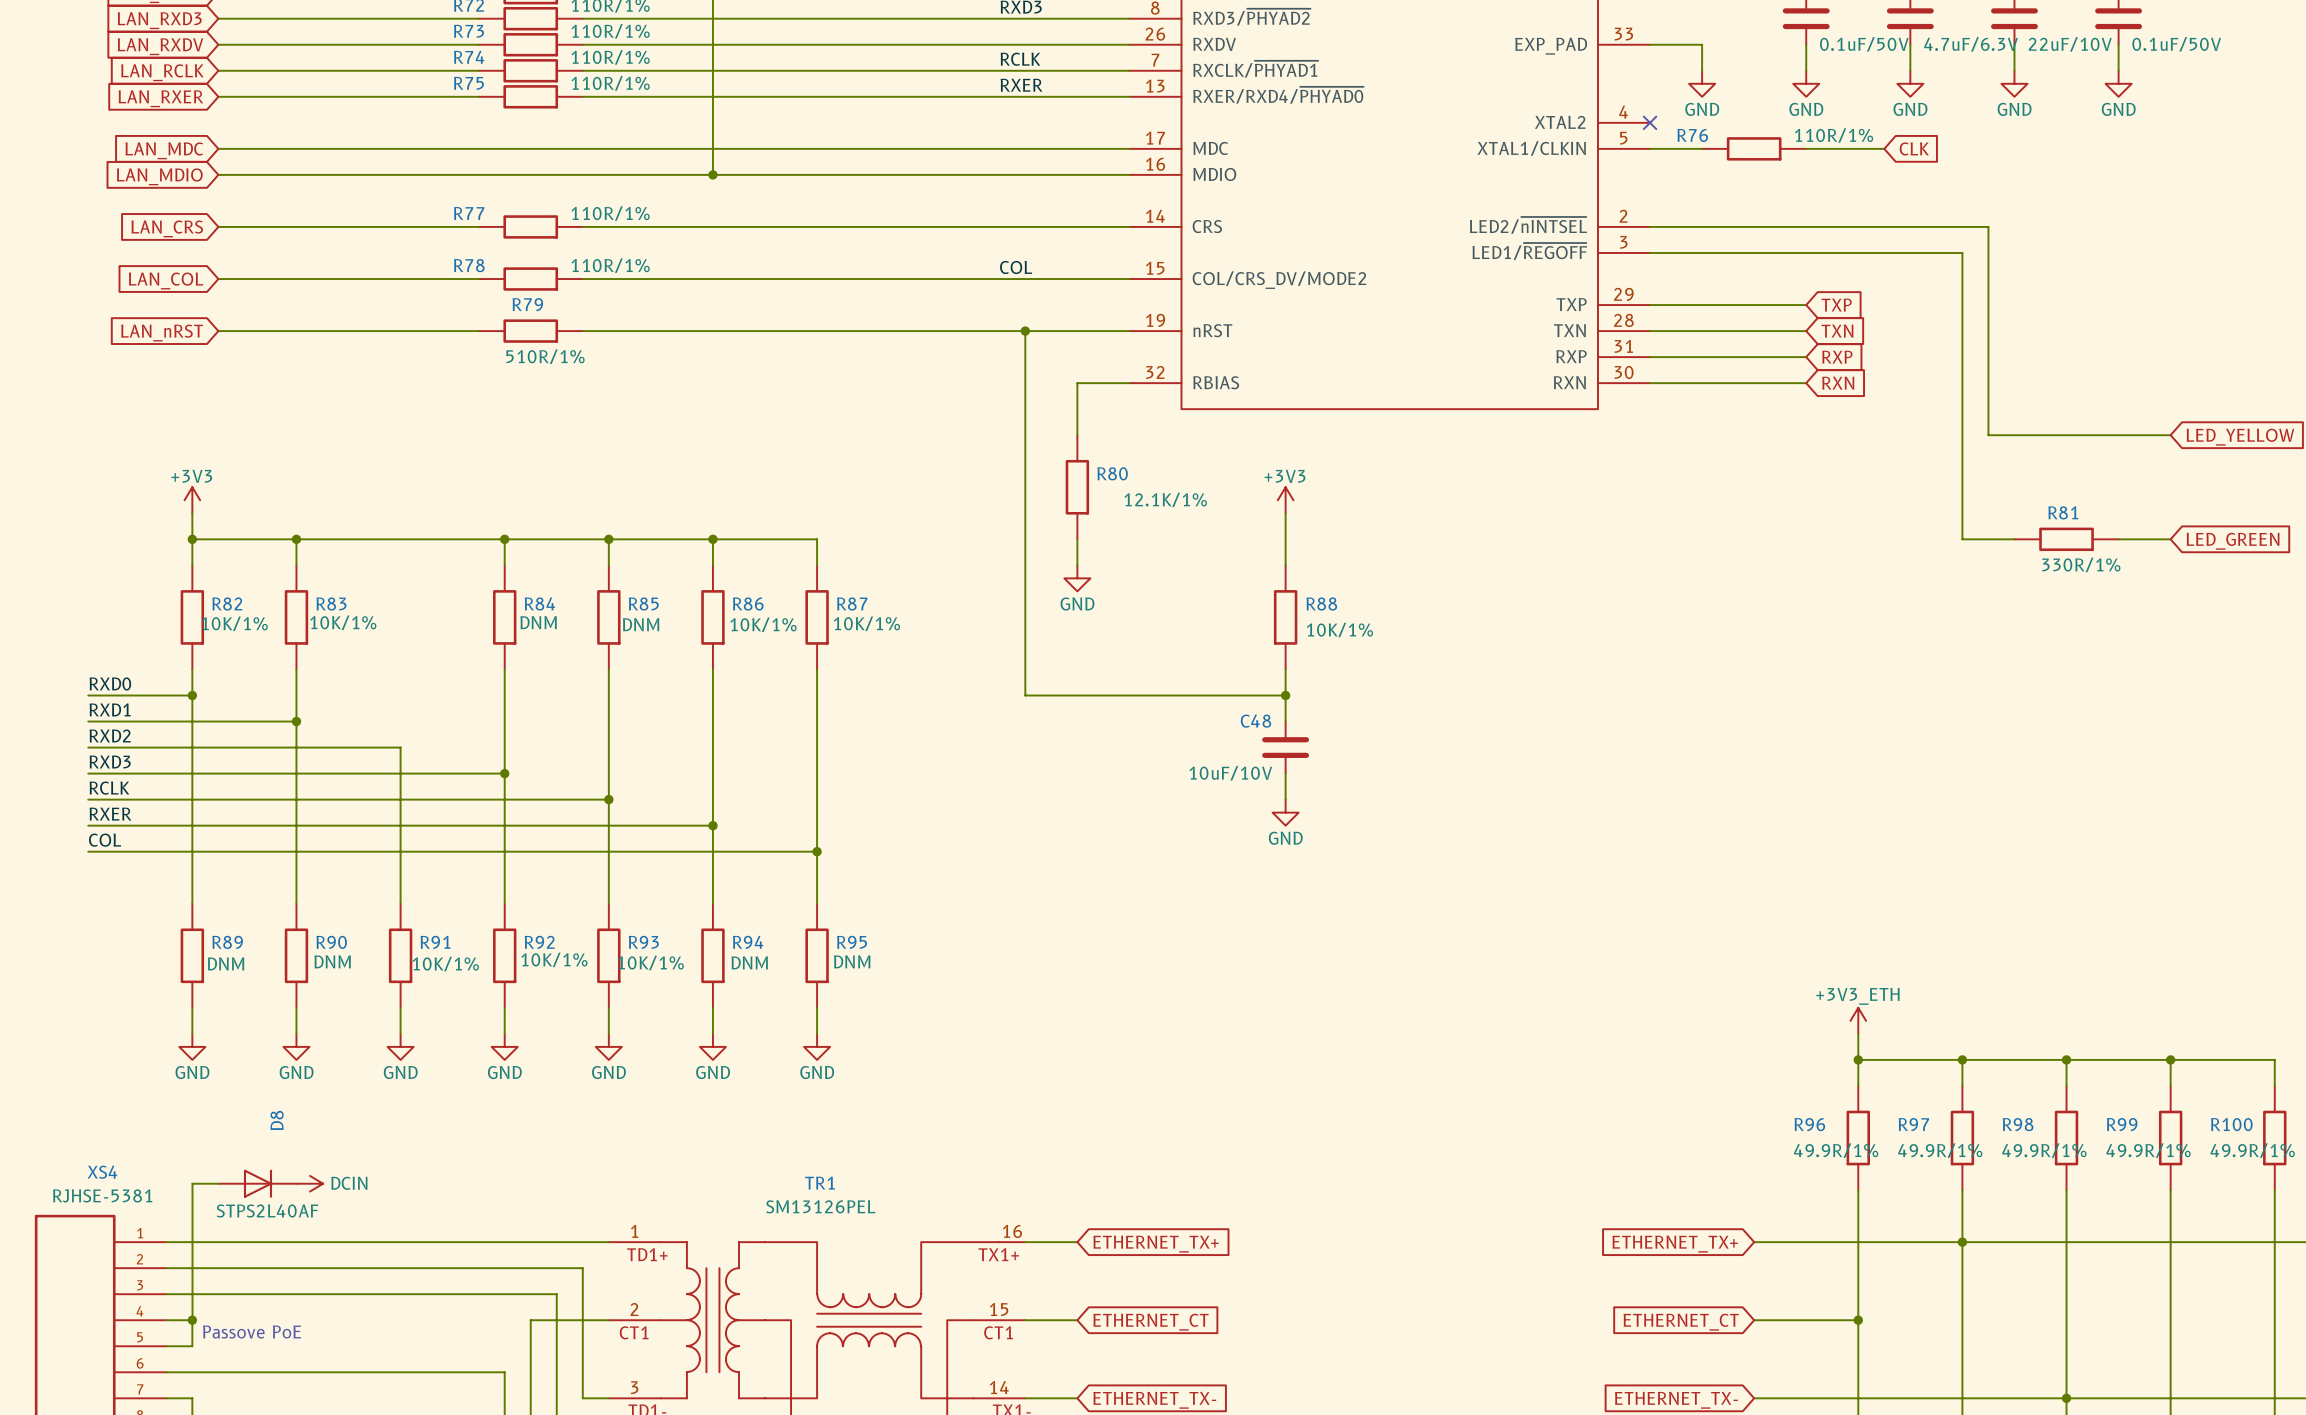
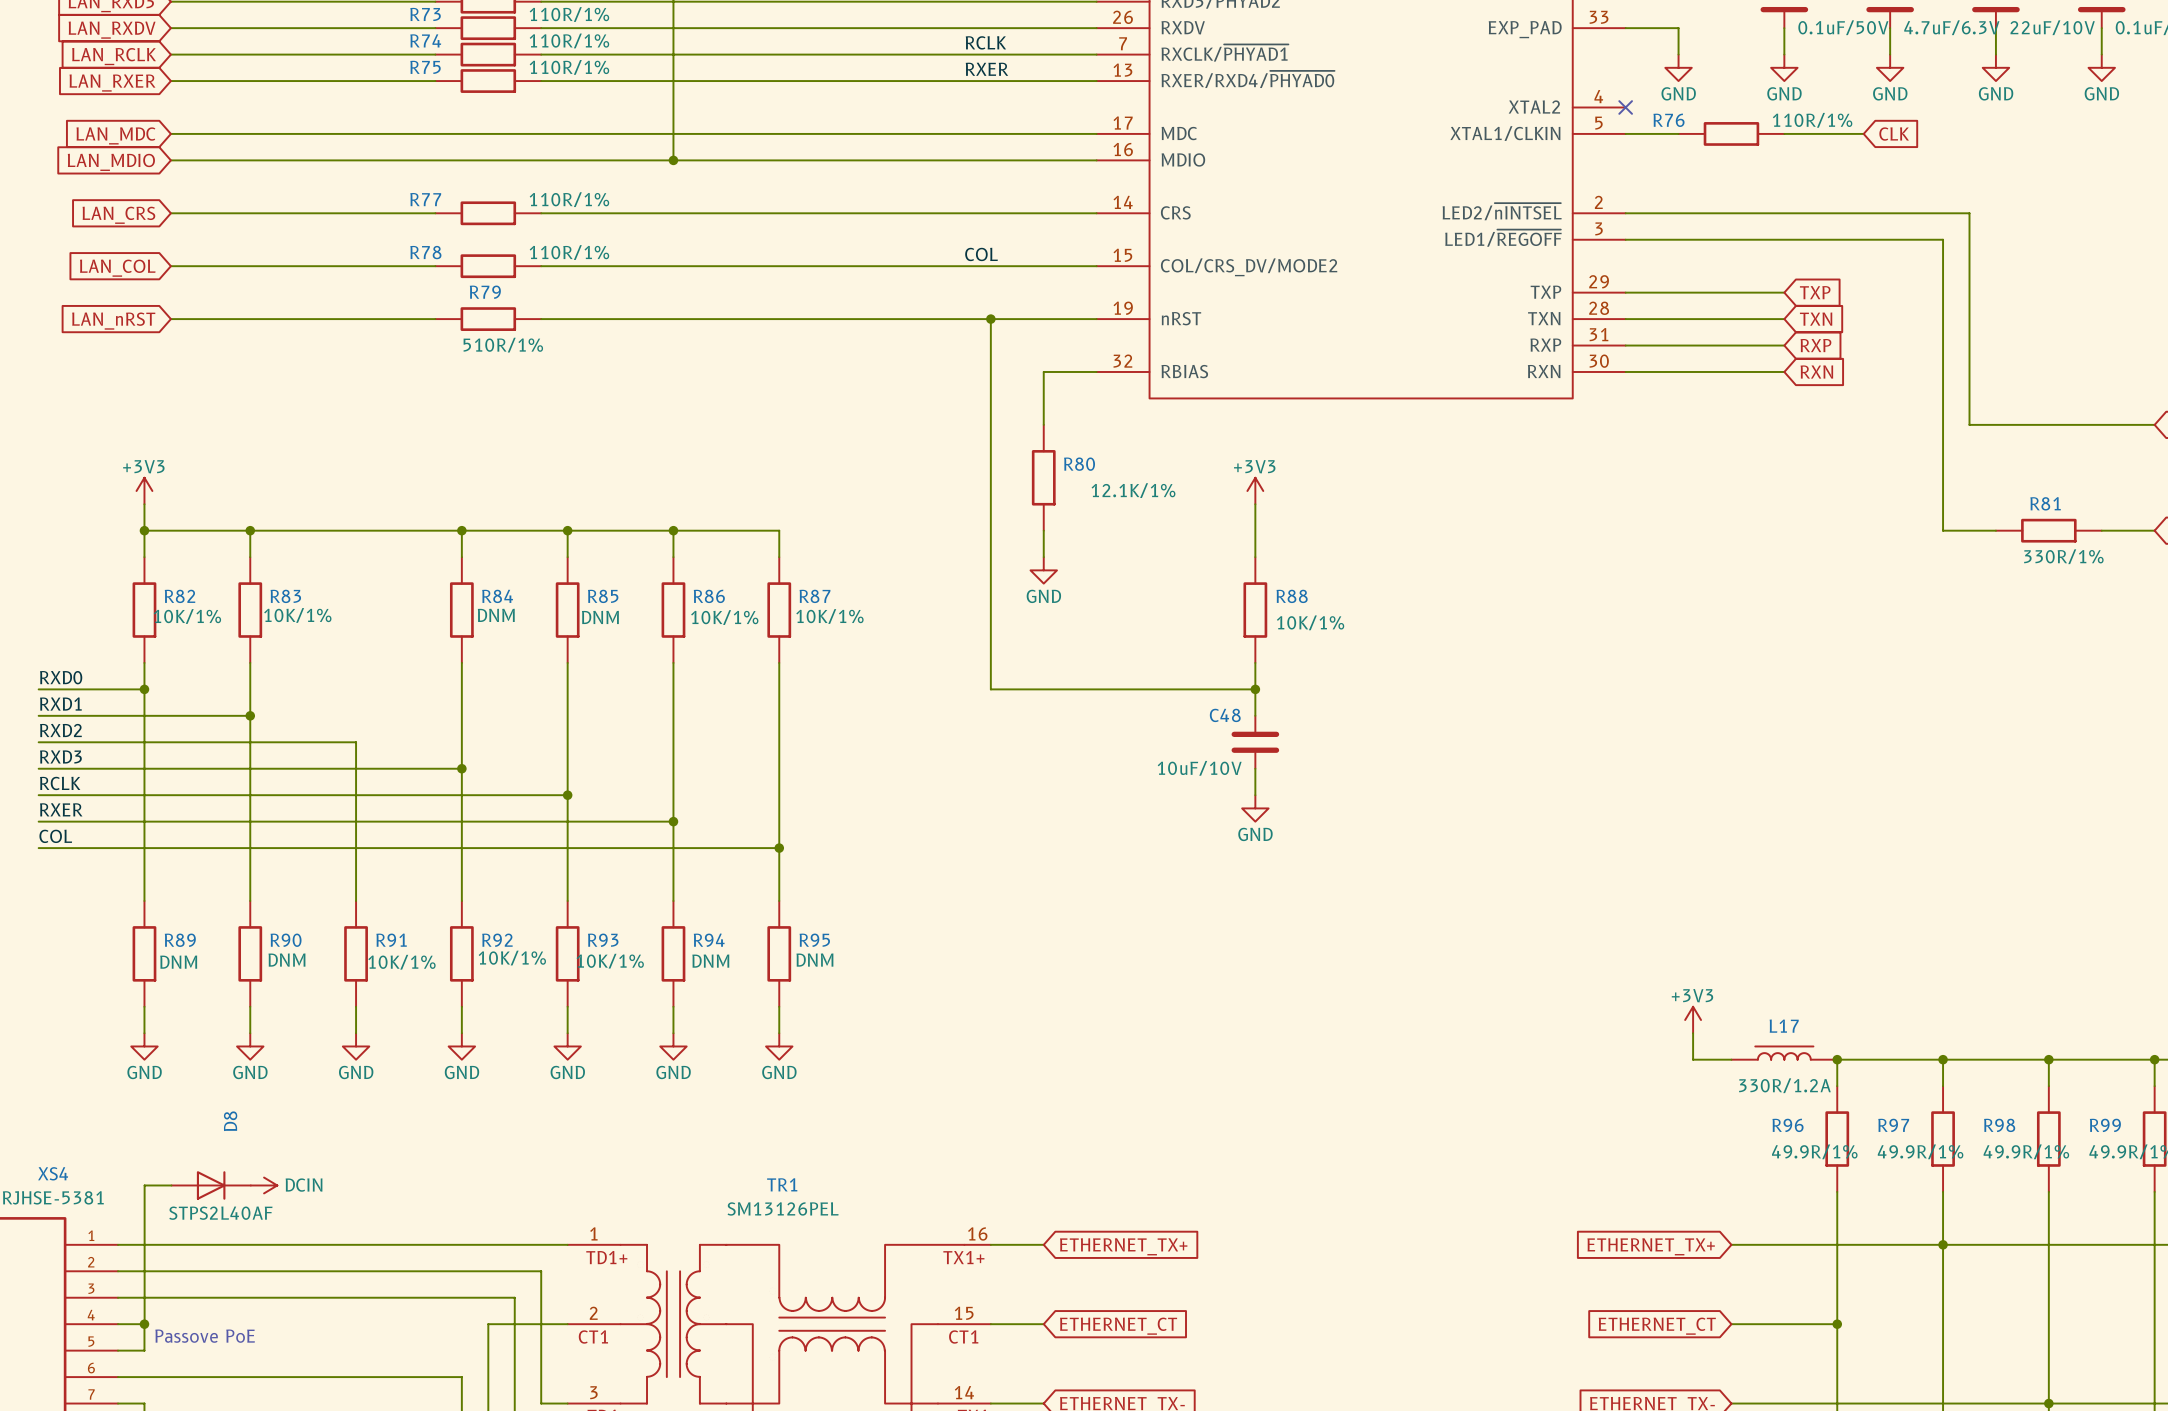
power symbol: none -> +3V3 (1693, 1020)
power symbol: +3V3_ETH (1858, 1020) -> none
wire: none -> (1693, 1033) (1693, 1059) (1731, 1059)
wire: (1858, 1033) (1858, 1059) -> none
L17: none -> 330R/1.2A (1784, 1053)

